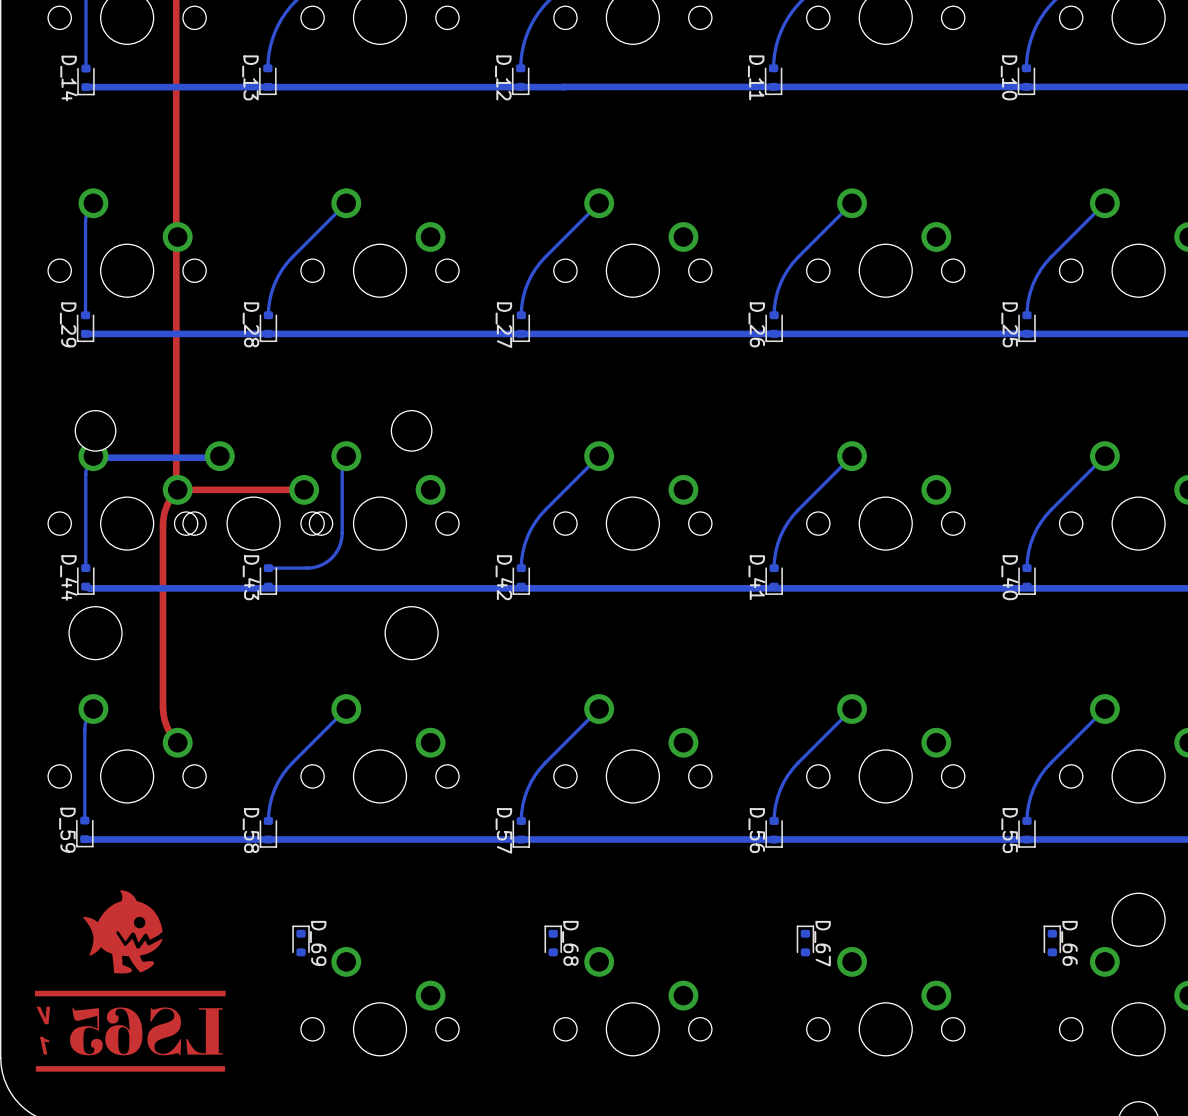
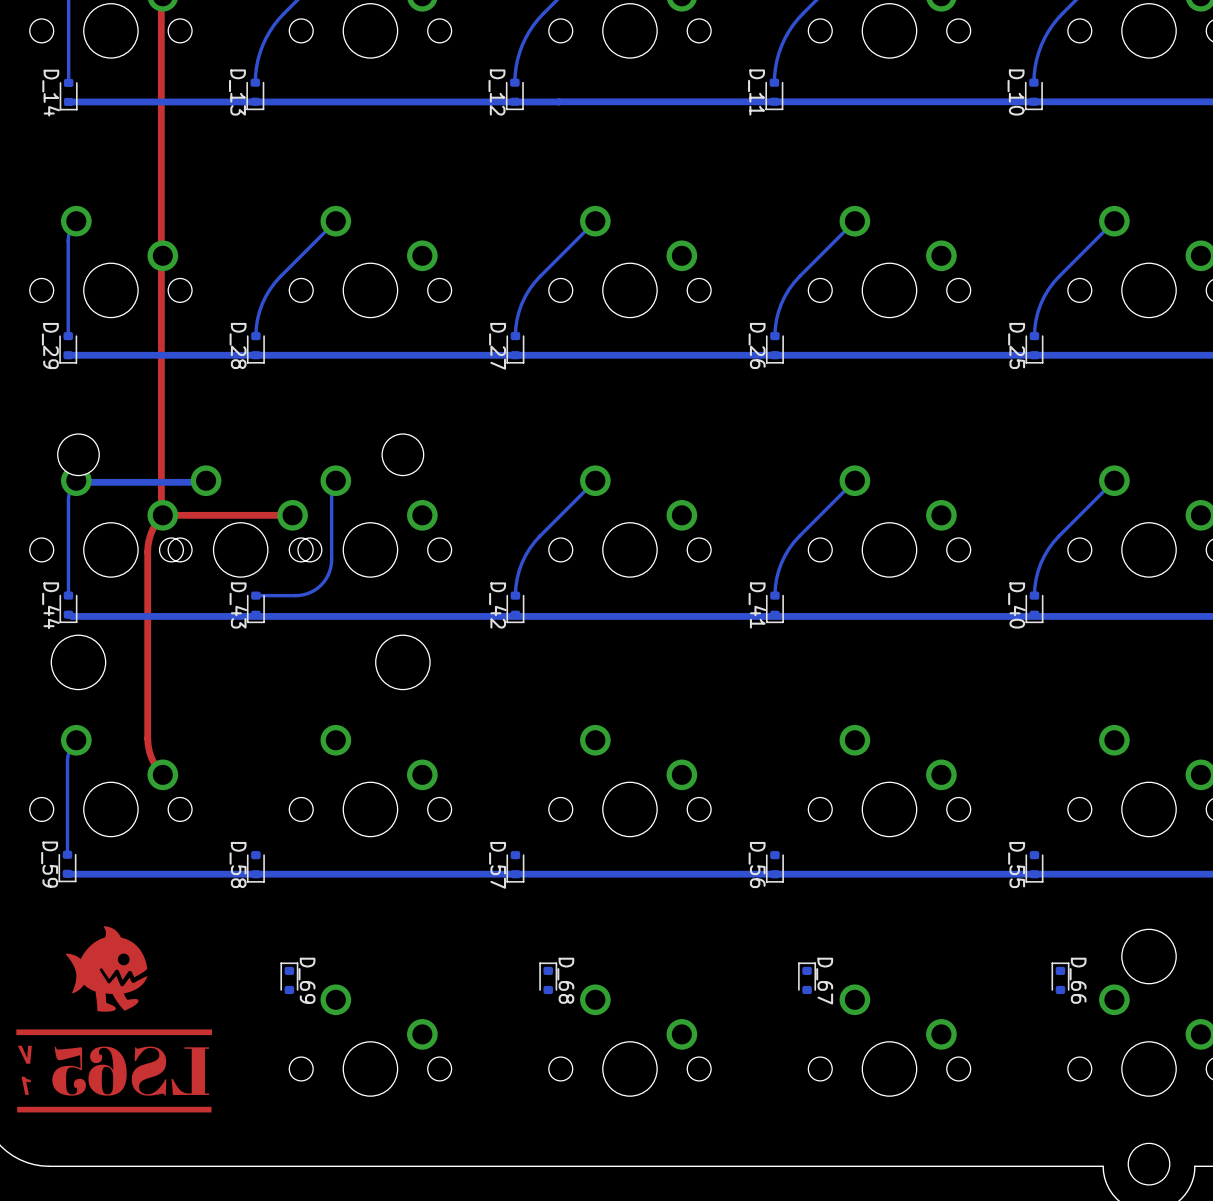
bottom track: (346, 709) (282, 775) (271, 797) (268, 820) -> none
bottom track: (599, 709) (535, 775) (524, 797) (521, 820) -> none
bottom track: (852, 709) (788, 775) (777, 797) (774, 820) -> none
bottom track: (1104, 709) (1040, 775) (1030, 797) (1027, 820) -> none

